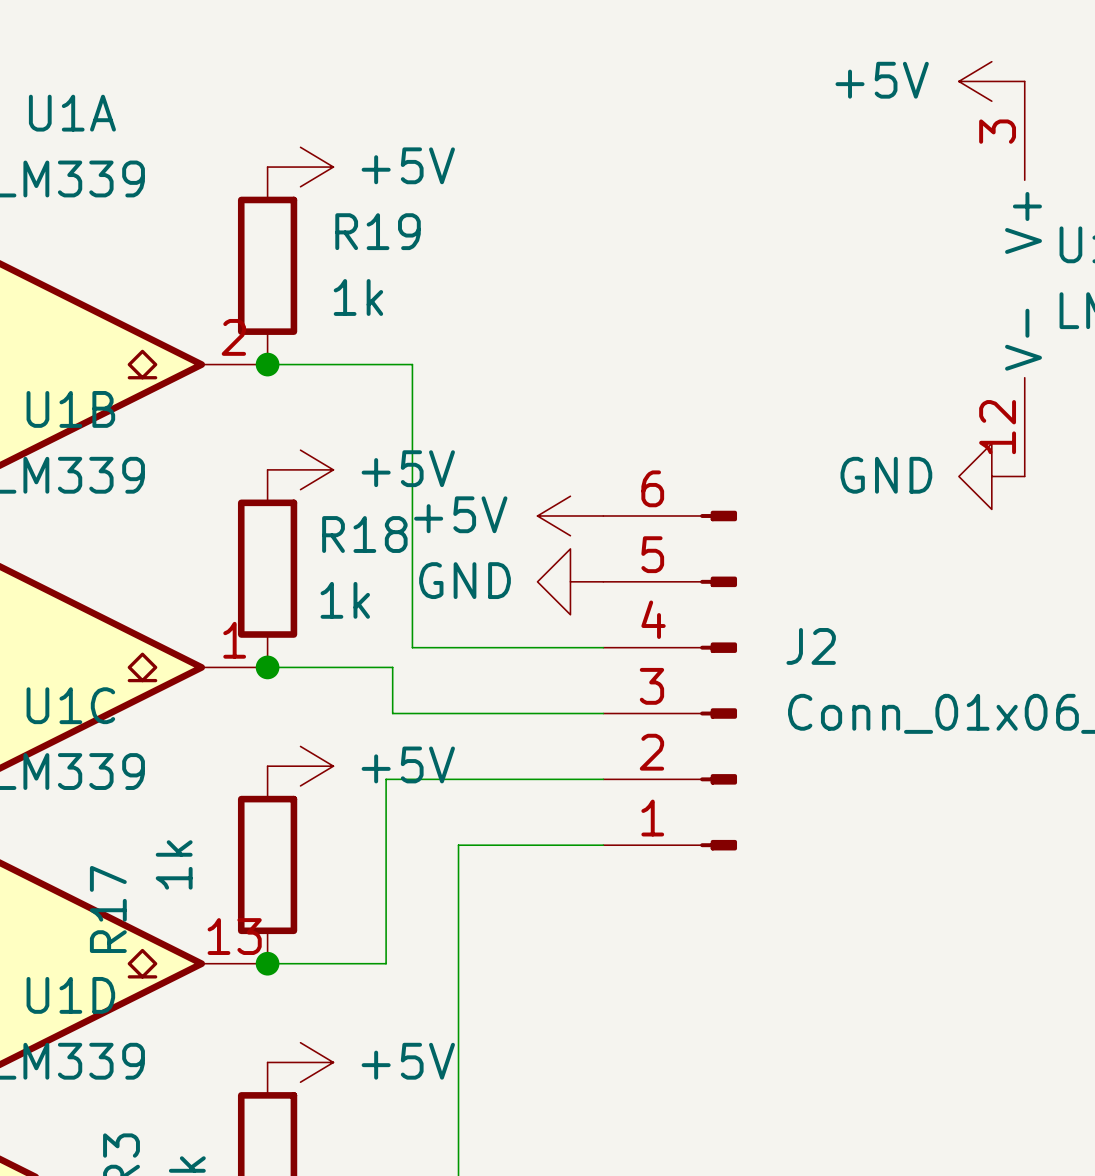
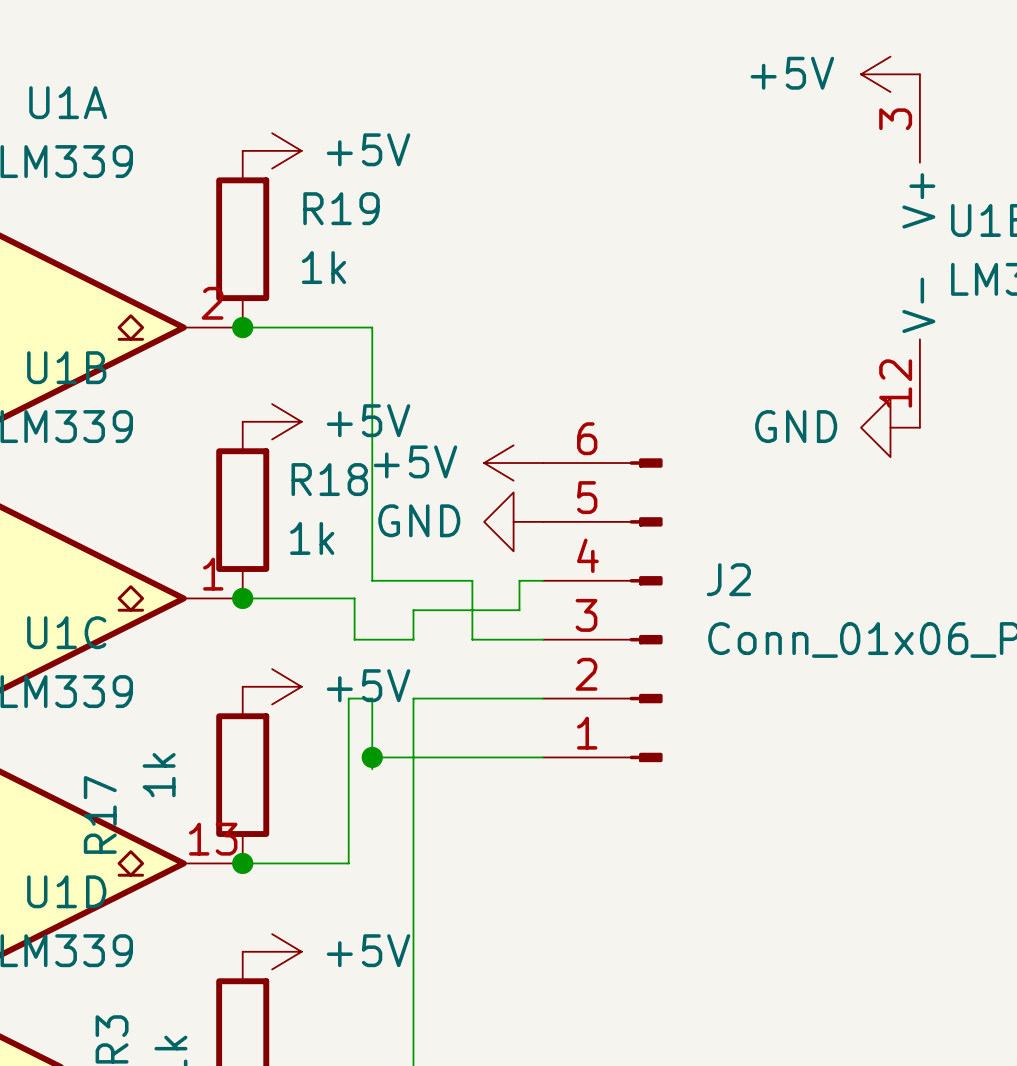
wire: (524, 647) (577, 647) -> (472, 580) (472, 639)
wire: (458, 713) (524, 713) -> (413, 639) (413, 610) (519, 610) (519, 580)
wire: (412, 779) (458, 779) -> (372, 757) (413, 757) (413, 698)
wire: none -> (372, 698) (372, 769)
junction: none -> (372, 757)

